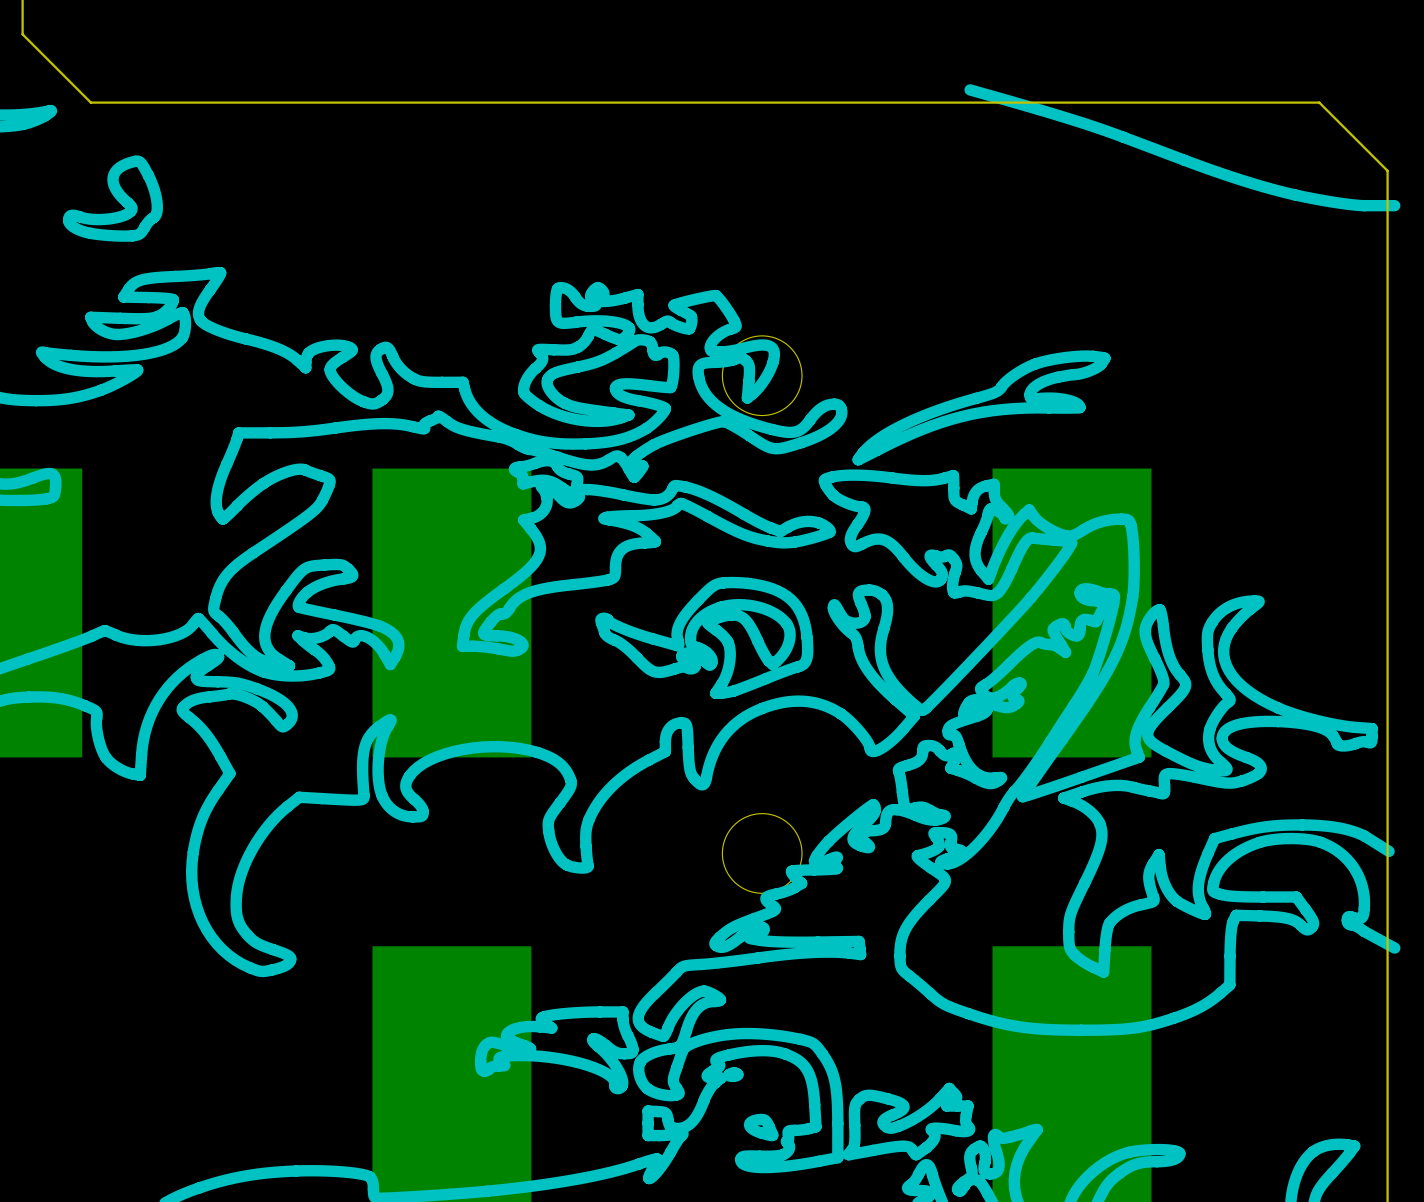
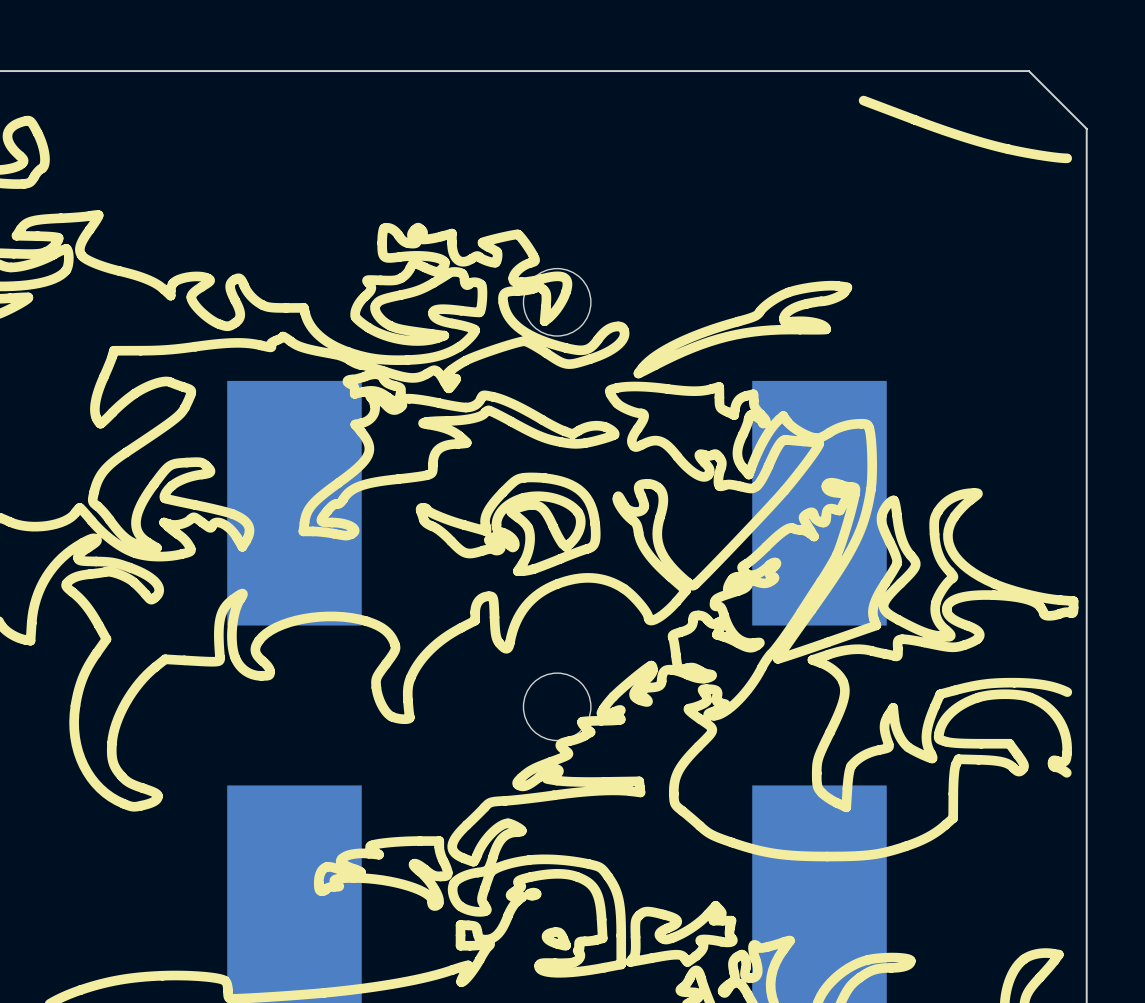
line: (970, 89) (1065, 117) (1124, 137) -> none
line: (1394, 205) (1364, 205) -> none
line: (1364, 836) (1389, 851) -> none
line: (1364, 931) (1394, 948) -> none

